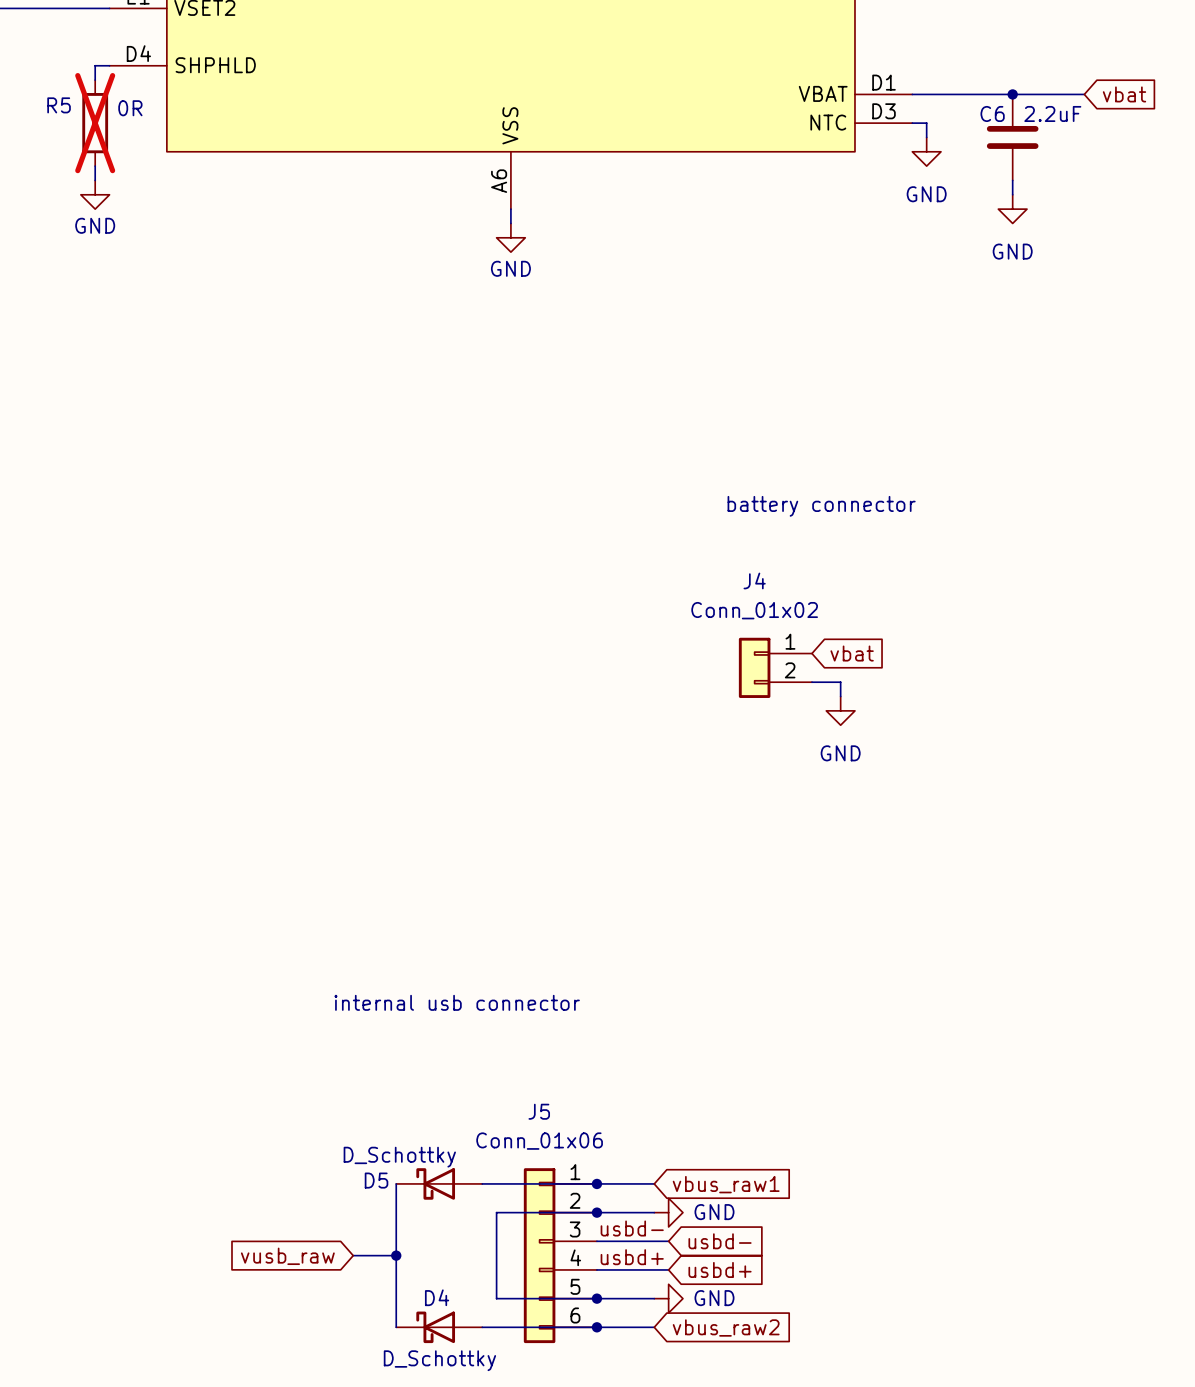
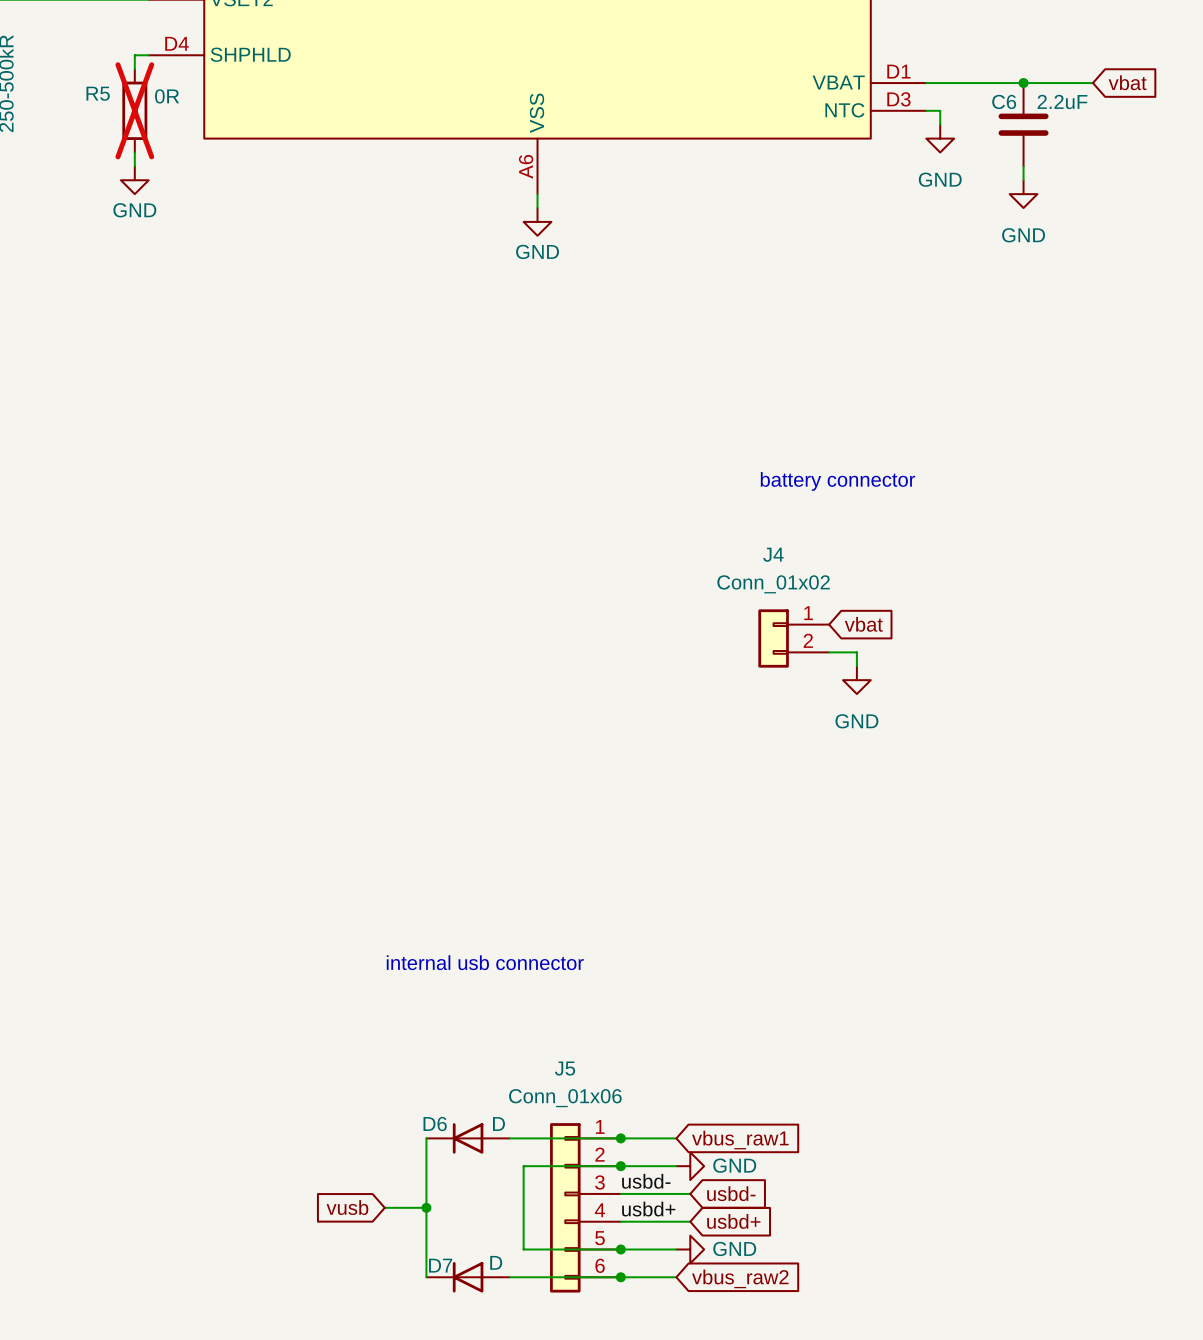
D5: D_Schottky (439, 1183) -> none
D6: none -> D (468, 1138)
global label: vusb_raw (287, 1256) -> vusb (347, 1207)
D4: D_Schottky (439, 1327) -> none
D7: none -> D (468, 1277)

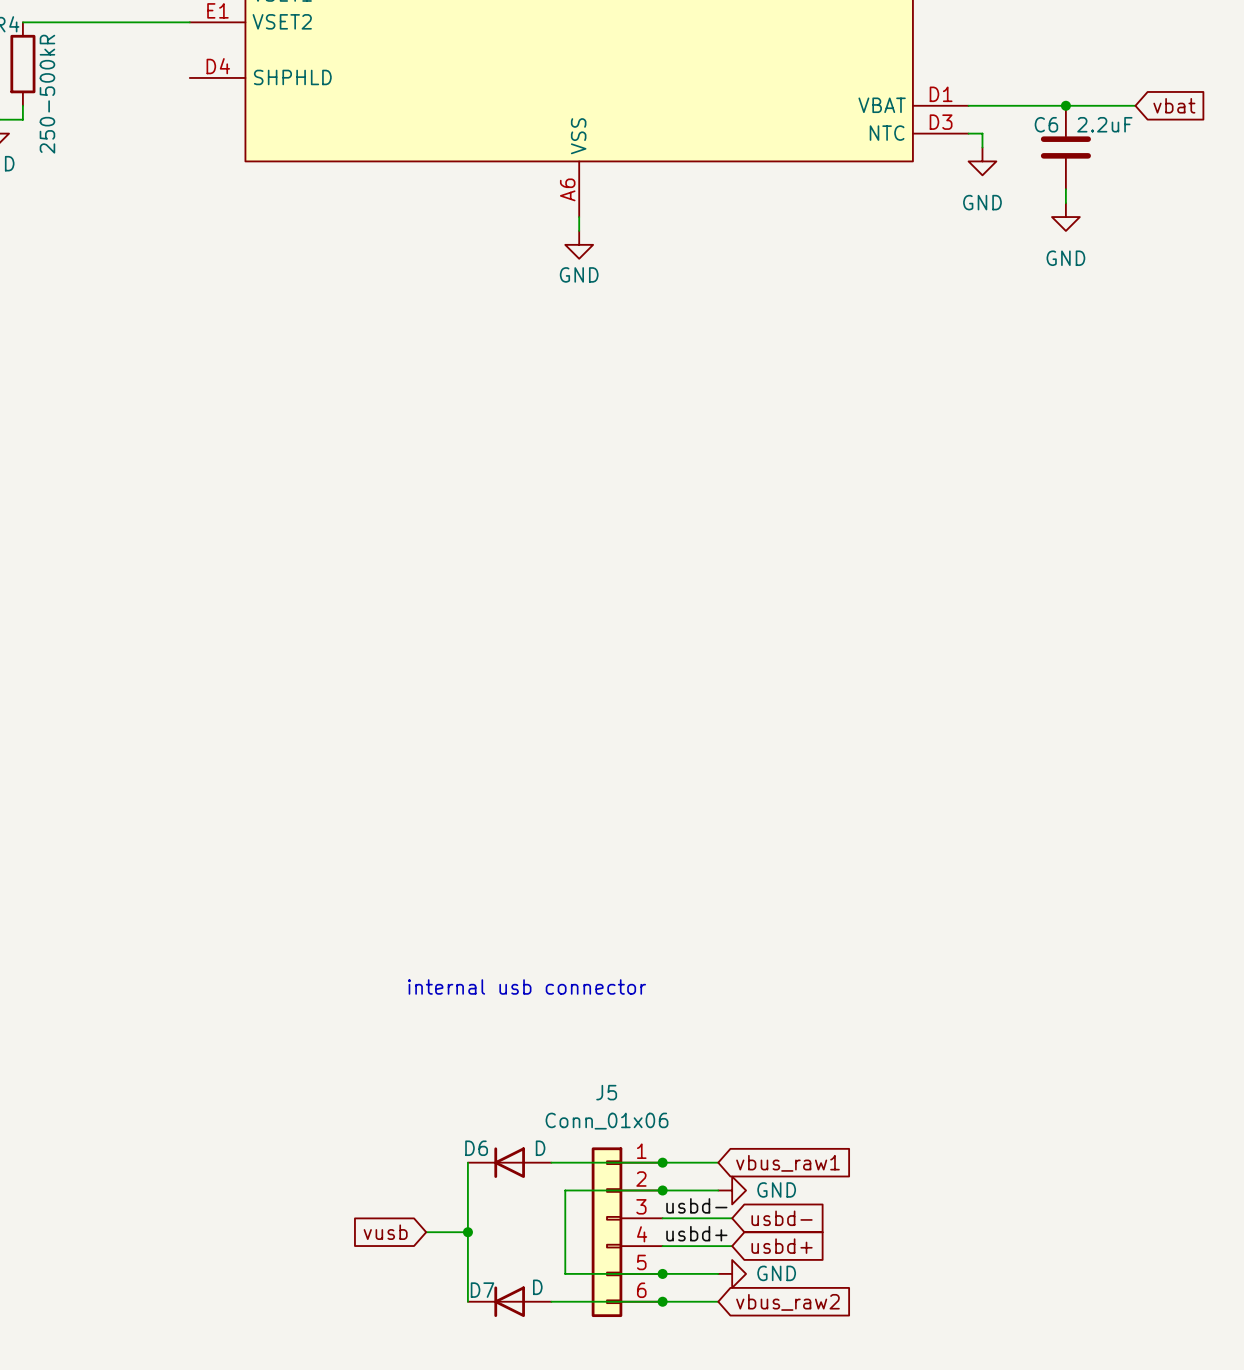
wire: (148, 55) (134, 55) (134, 69) -> none
R5: 0R (134, 110) -> none
wire: (134, 152) (134, 166) -> none
power symbol: GND (134, 180) -> none
text: battery connector (837, 481) -> none
global label: vbat (863, 624) -> none
J4: Conn_01x02 (793, 638) -> none
wire: (829, 652) (856, 652) (856, 666) -> none
power symbol: GND (856, 680) -> none

